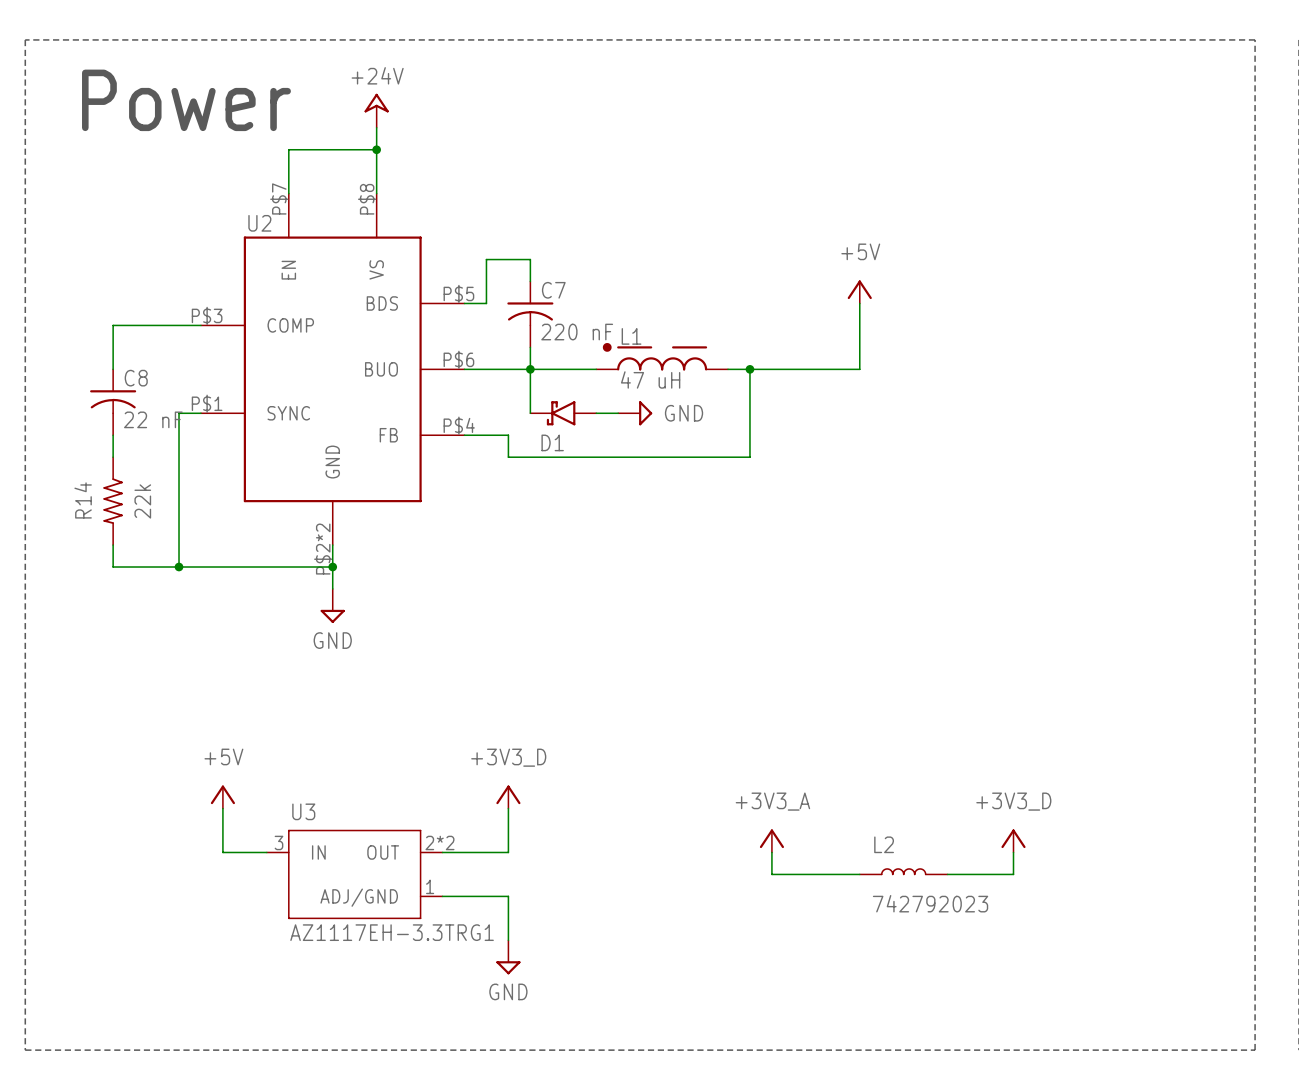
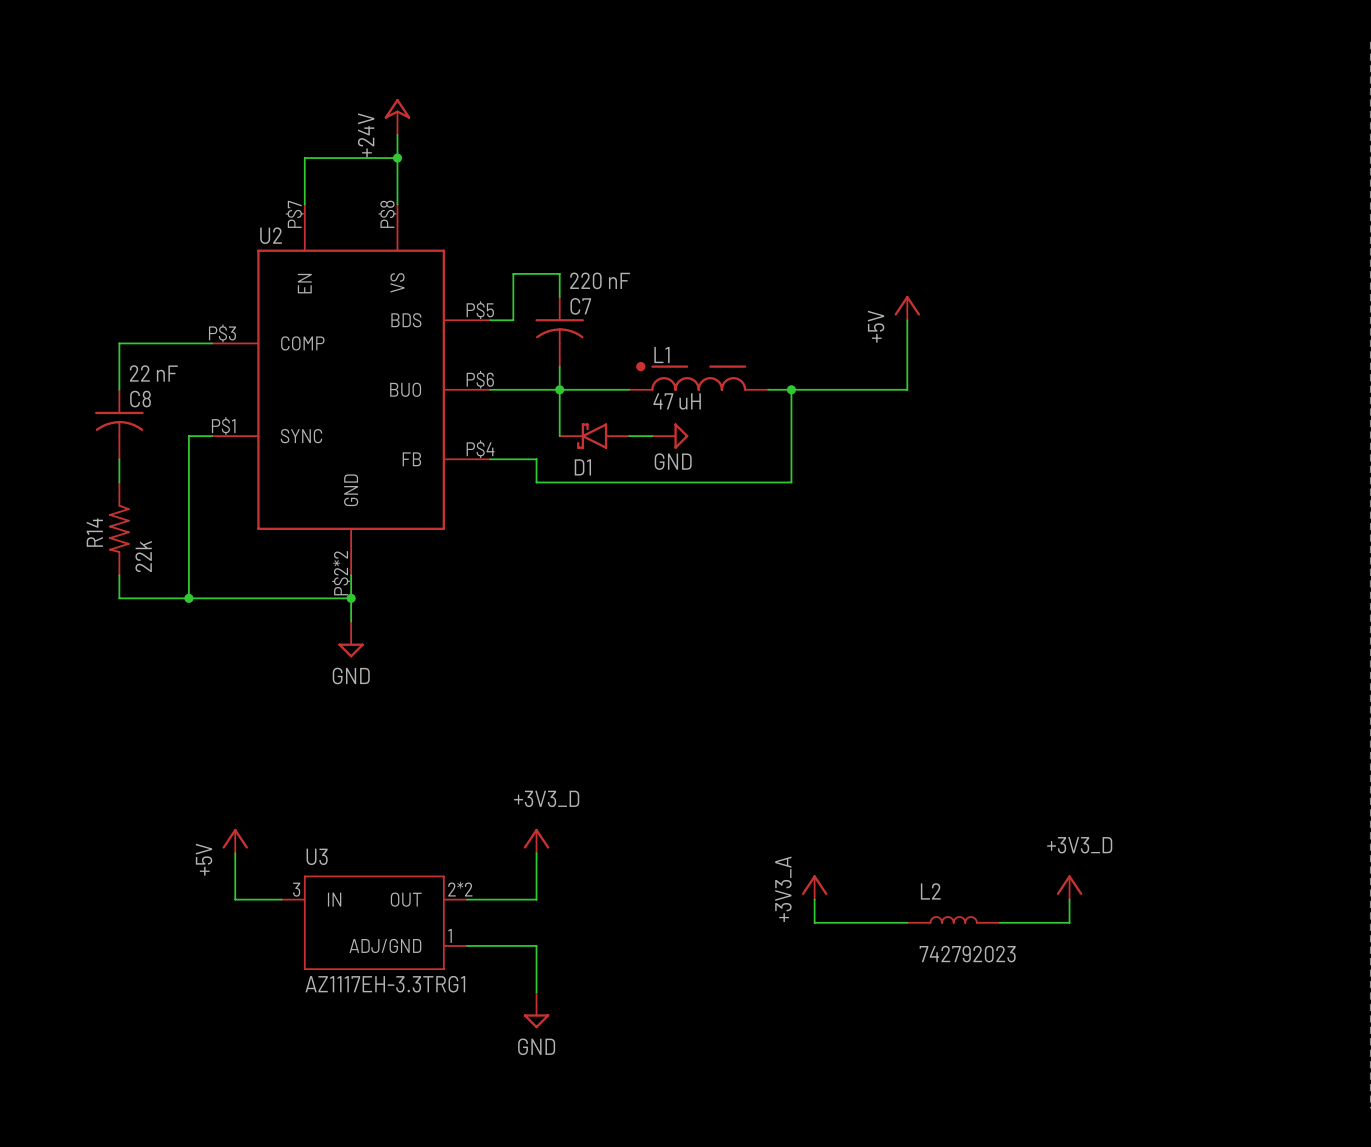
line: (25, 39) (25, 1050) (1255, 1050) (1255, 39) (25, 39) -> none
power symbol text rotation: 0° (377, 75) -> 90° counterclockwise (366, 135)
text: Power (186, 100) -> none
power symbol text rotation: 0° (860, 251) -> 90° counterclockwise (876, 326)
power symbol text position: +5V (860, 251) -> +5V (876, 326)
C7 value position: 220 nF (577, 332) -> 220 nF (600, 280)
power symbol text position: GND (684, 413) -> GND (673, 461)
C8 value position: 22 nF (153, 419) -> 22 nF (153, 373)
R14 name position: R14 (83, 500) -> R14 (94, 532)
R14 value position: 22k (142, 501) -> 22k (143, 556)
power symbol text rotation: 0° (223, 756) -> 90° counterclockwise (204, 859)
power symbol text position: +5V (223, 756) -> +5V (204, 859)
power symbol text position: +3V3_D (508, 757) -> +3V3_D (546, 798)
power symbol text rotation: 0° (772, 801) -> 90° counterclockwise (783, 889)
power symbol text position: +3V3_D (1013, 801) -> +3V3_D (1079, 845)

